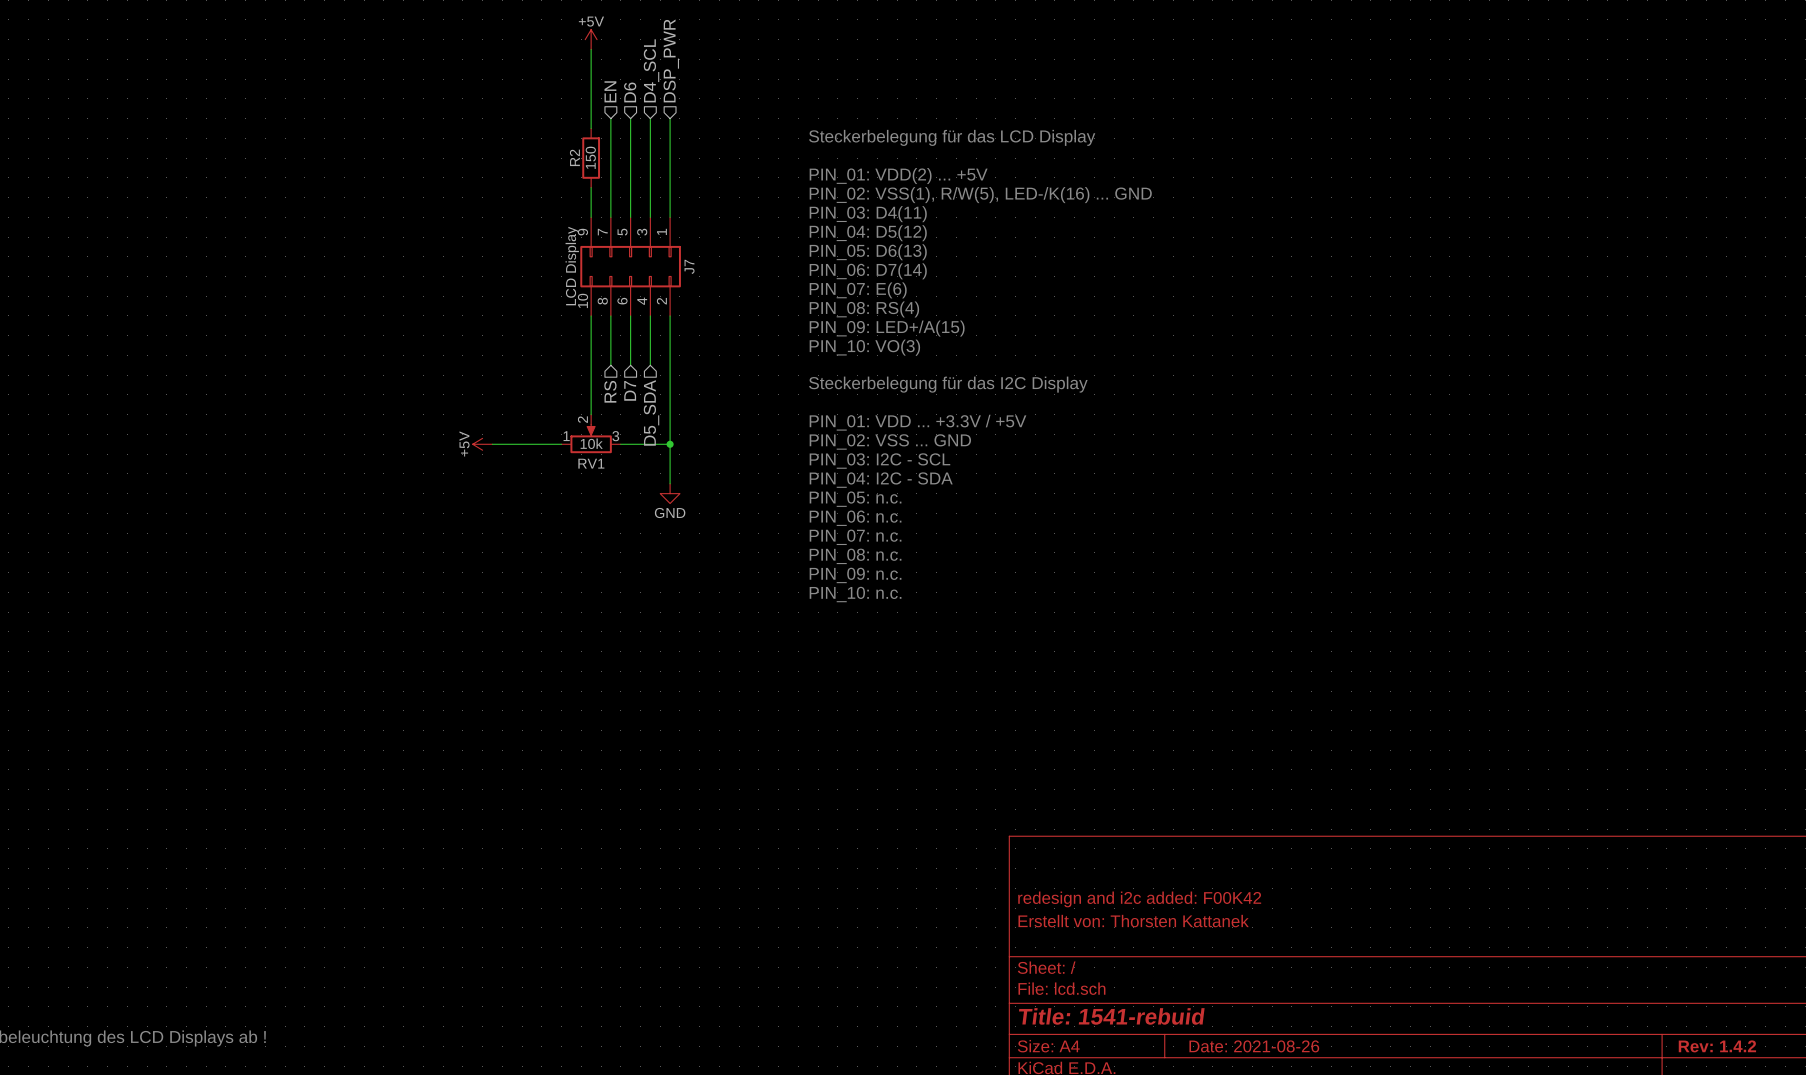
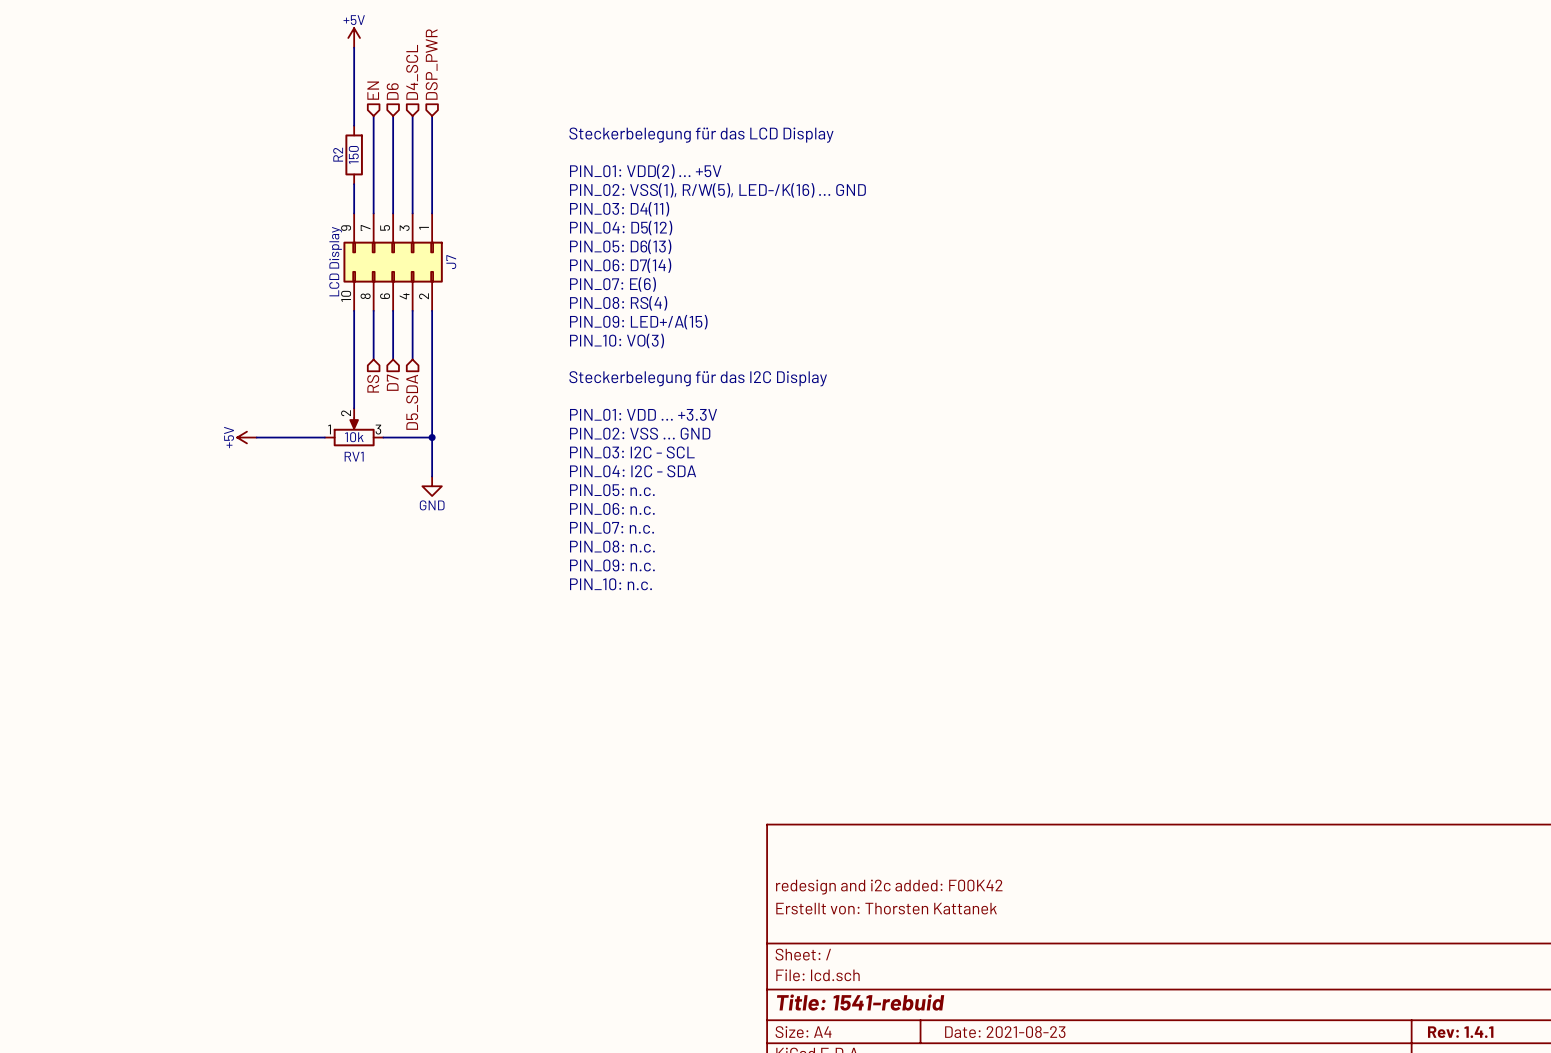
text: PIN_01: VDD ... +3.3V / +5V (918, 422) -> PIN_01: VDD ... +3.3V (643, 414)
title block: Date: 2021-08-26 (1254, 1046) -> Date: 2021-08-23 (1005, 1032)
title block: Rev: 1.4.2 (1717, 1046) -> Rev: 1.4.1 (1460, 1032)

